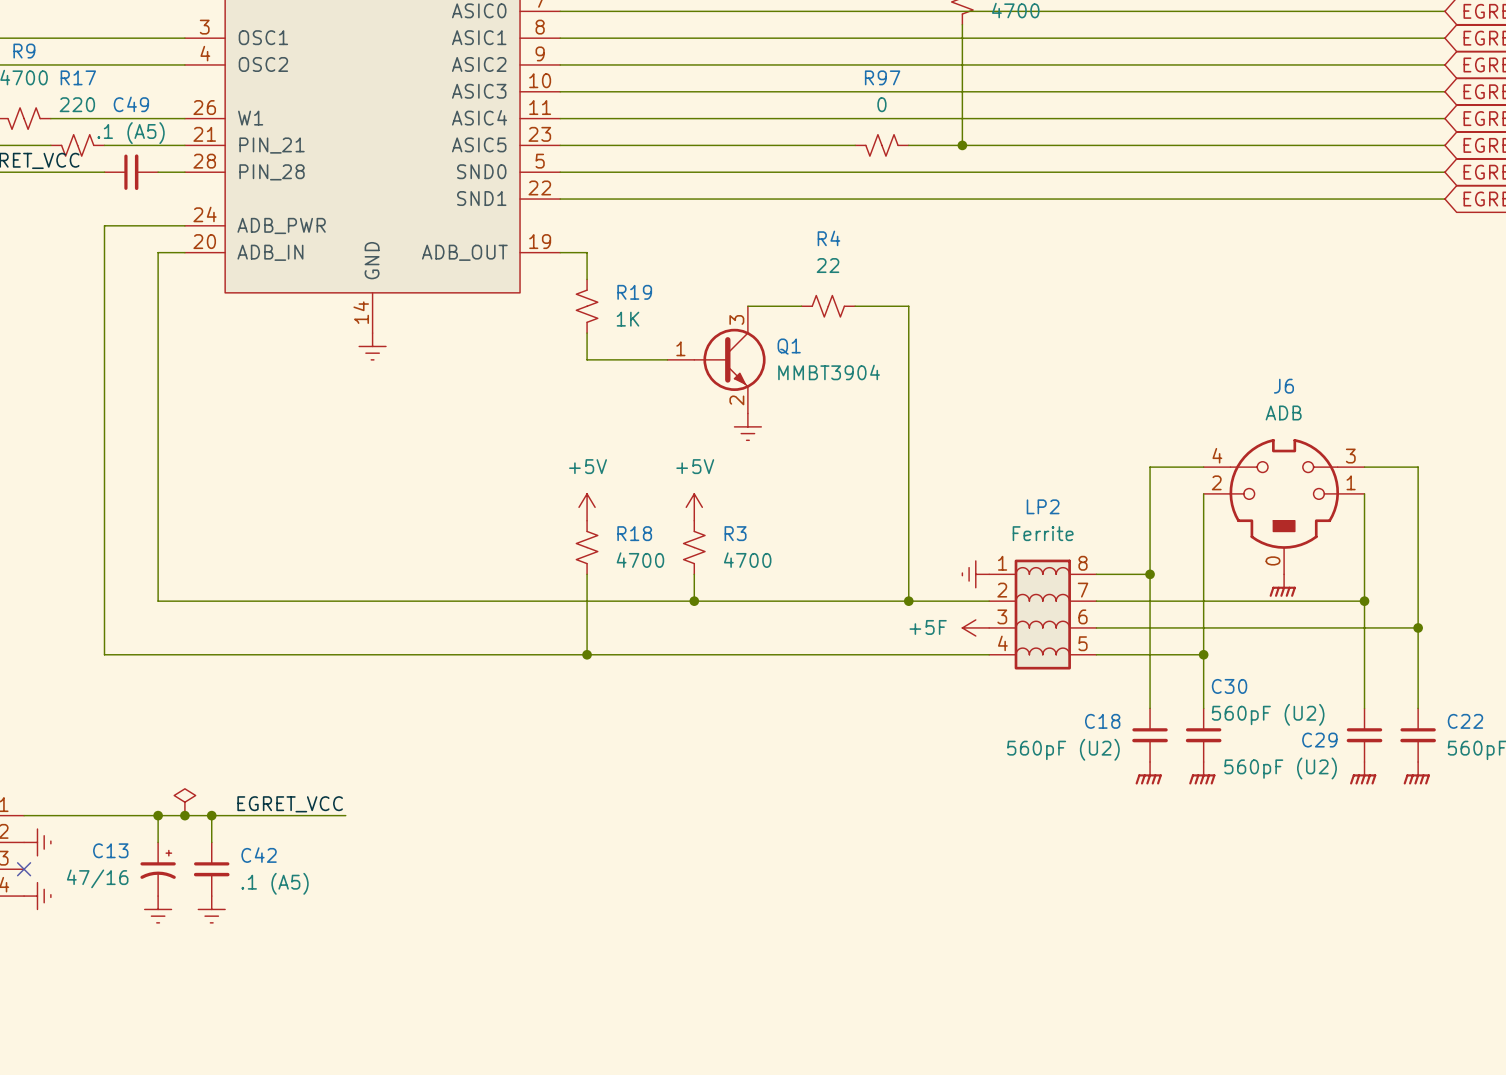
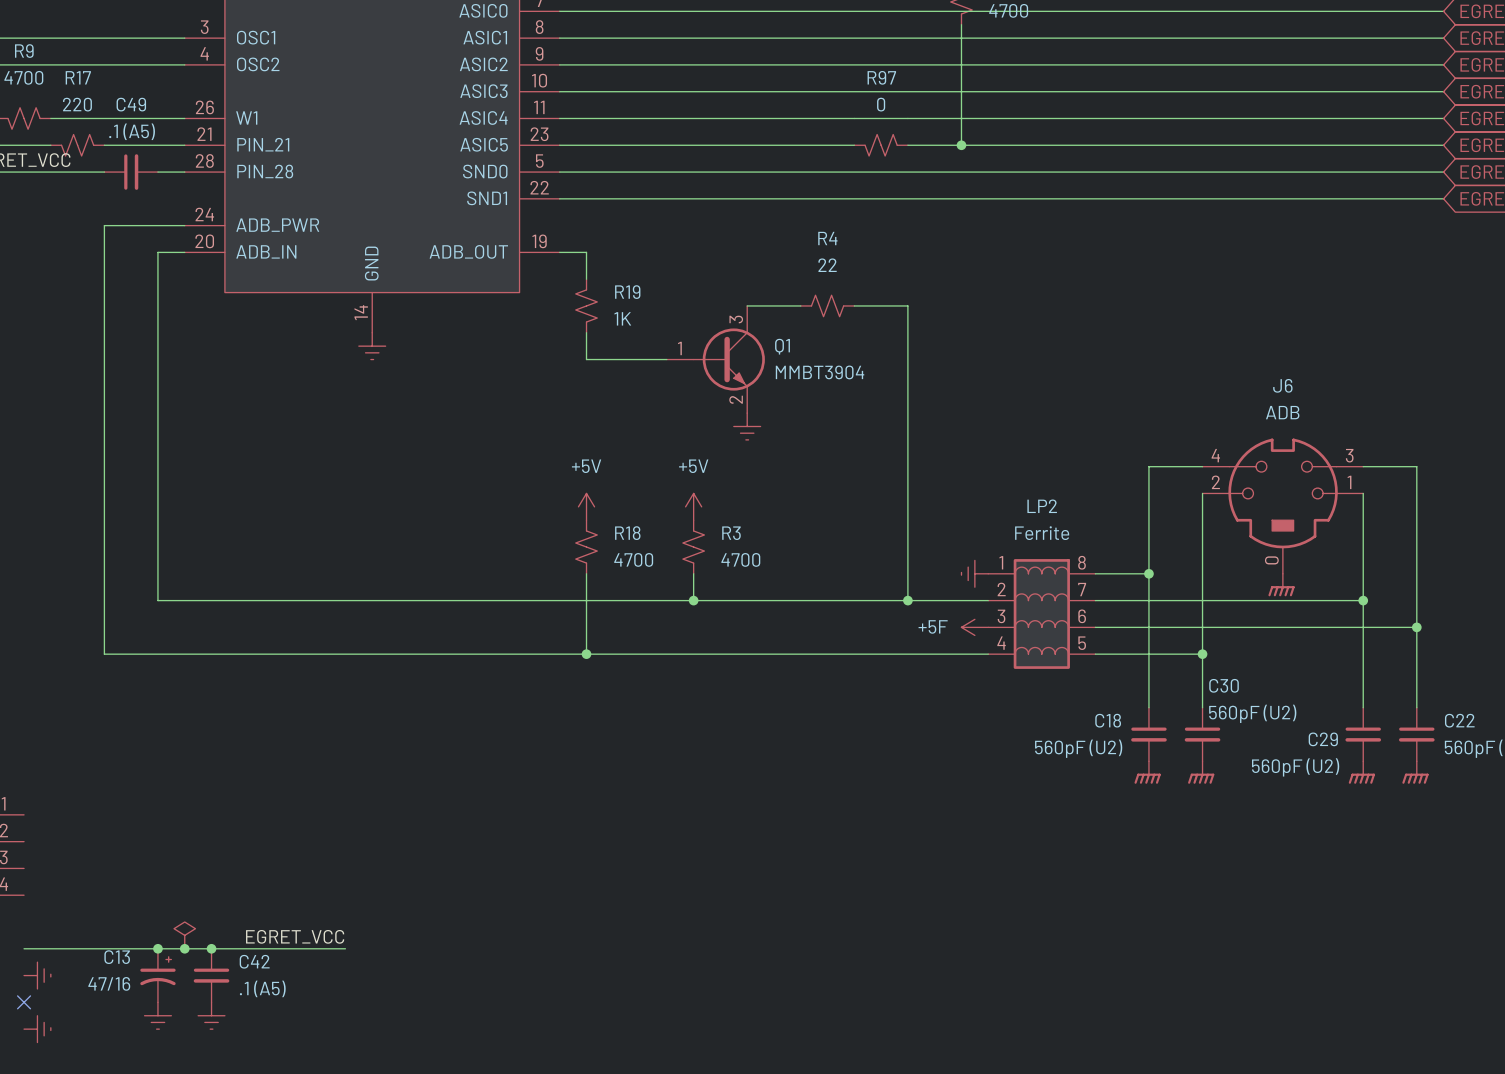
power symbol position: (184, 802) -> (184, 935)
label position: EGRET_VCC (290, 804) -> EGRET_VCC (295, 936)
wire: (24, 815) (345, 815) -> (24, 948) (345, 948)
wire: (158, 815) (158, 842) -> none
junction: (158, 815) -> none
junction: (184, 815) -> none
wire: (211, 815) (211, 842) -> none
junction: (211, 815) -> none
power symbol: (37, 842) -> none
no-connect mark: (24, 869) -> none
C13 position: (158, 869) -> (157, 975)
C42 position: (211, 869) -> (211, 975)
power symbol: (37, 896) -> none
power symbol: (158, 909) -> none
power symbol: (211, 909) -> none
junction: none -> (157, 948)
junction: none -> (184, 948)
junction: none -> (211, 948)
power symbol: none -> (37, 975)
no-connect mark: none -> (24, 1002)
power symbol: none -> (157, 1015)
power symbol: none -> (211, 1015)
power symbol: none -> (37, 1029)

